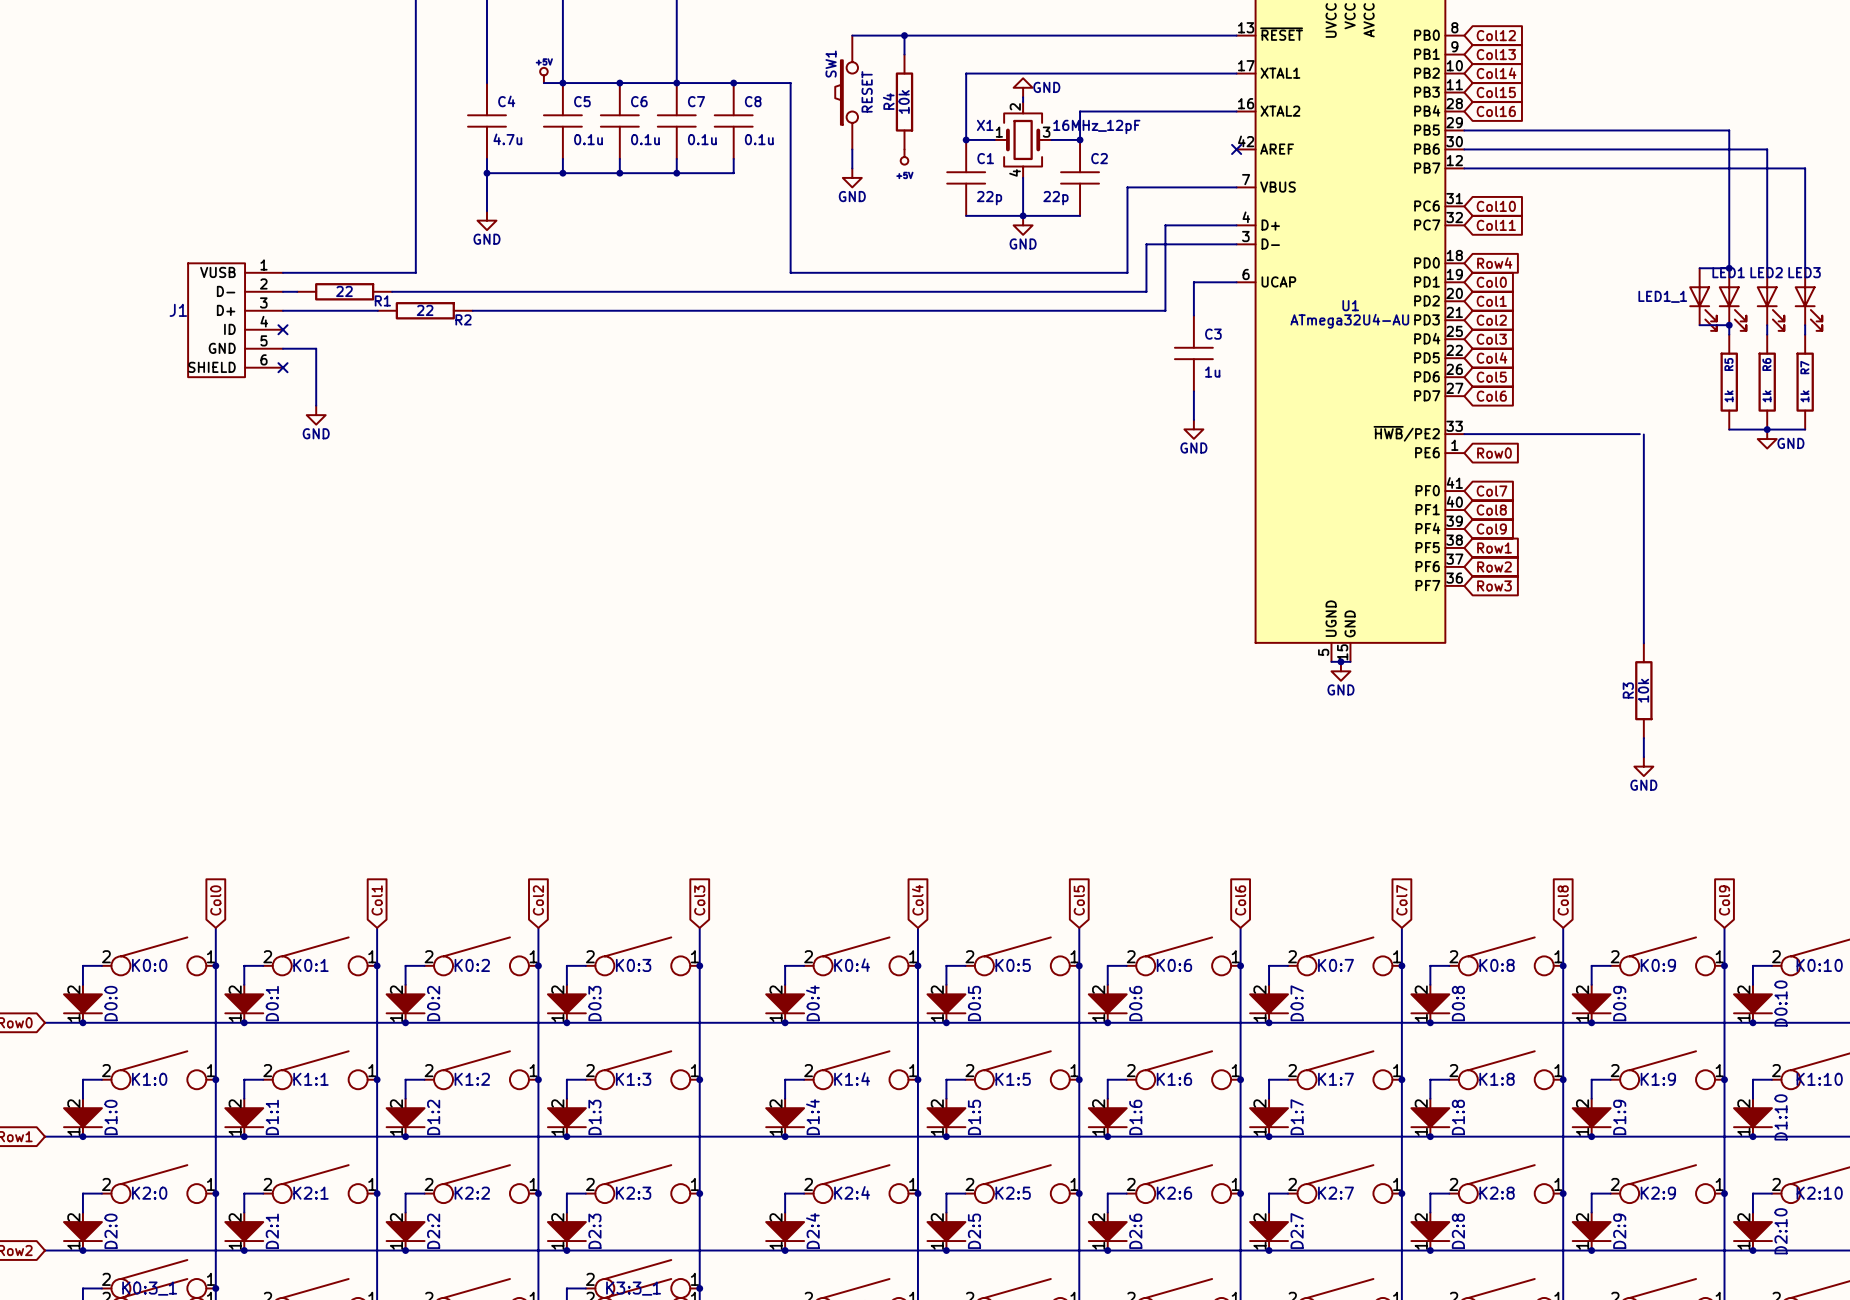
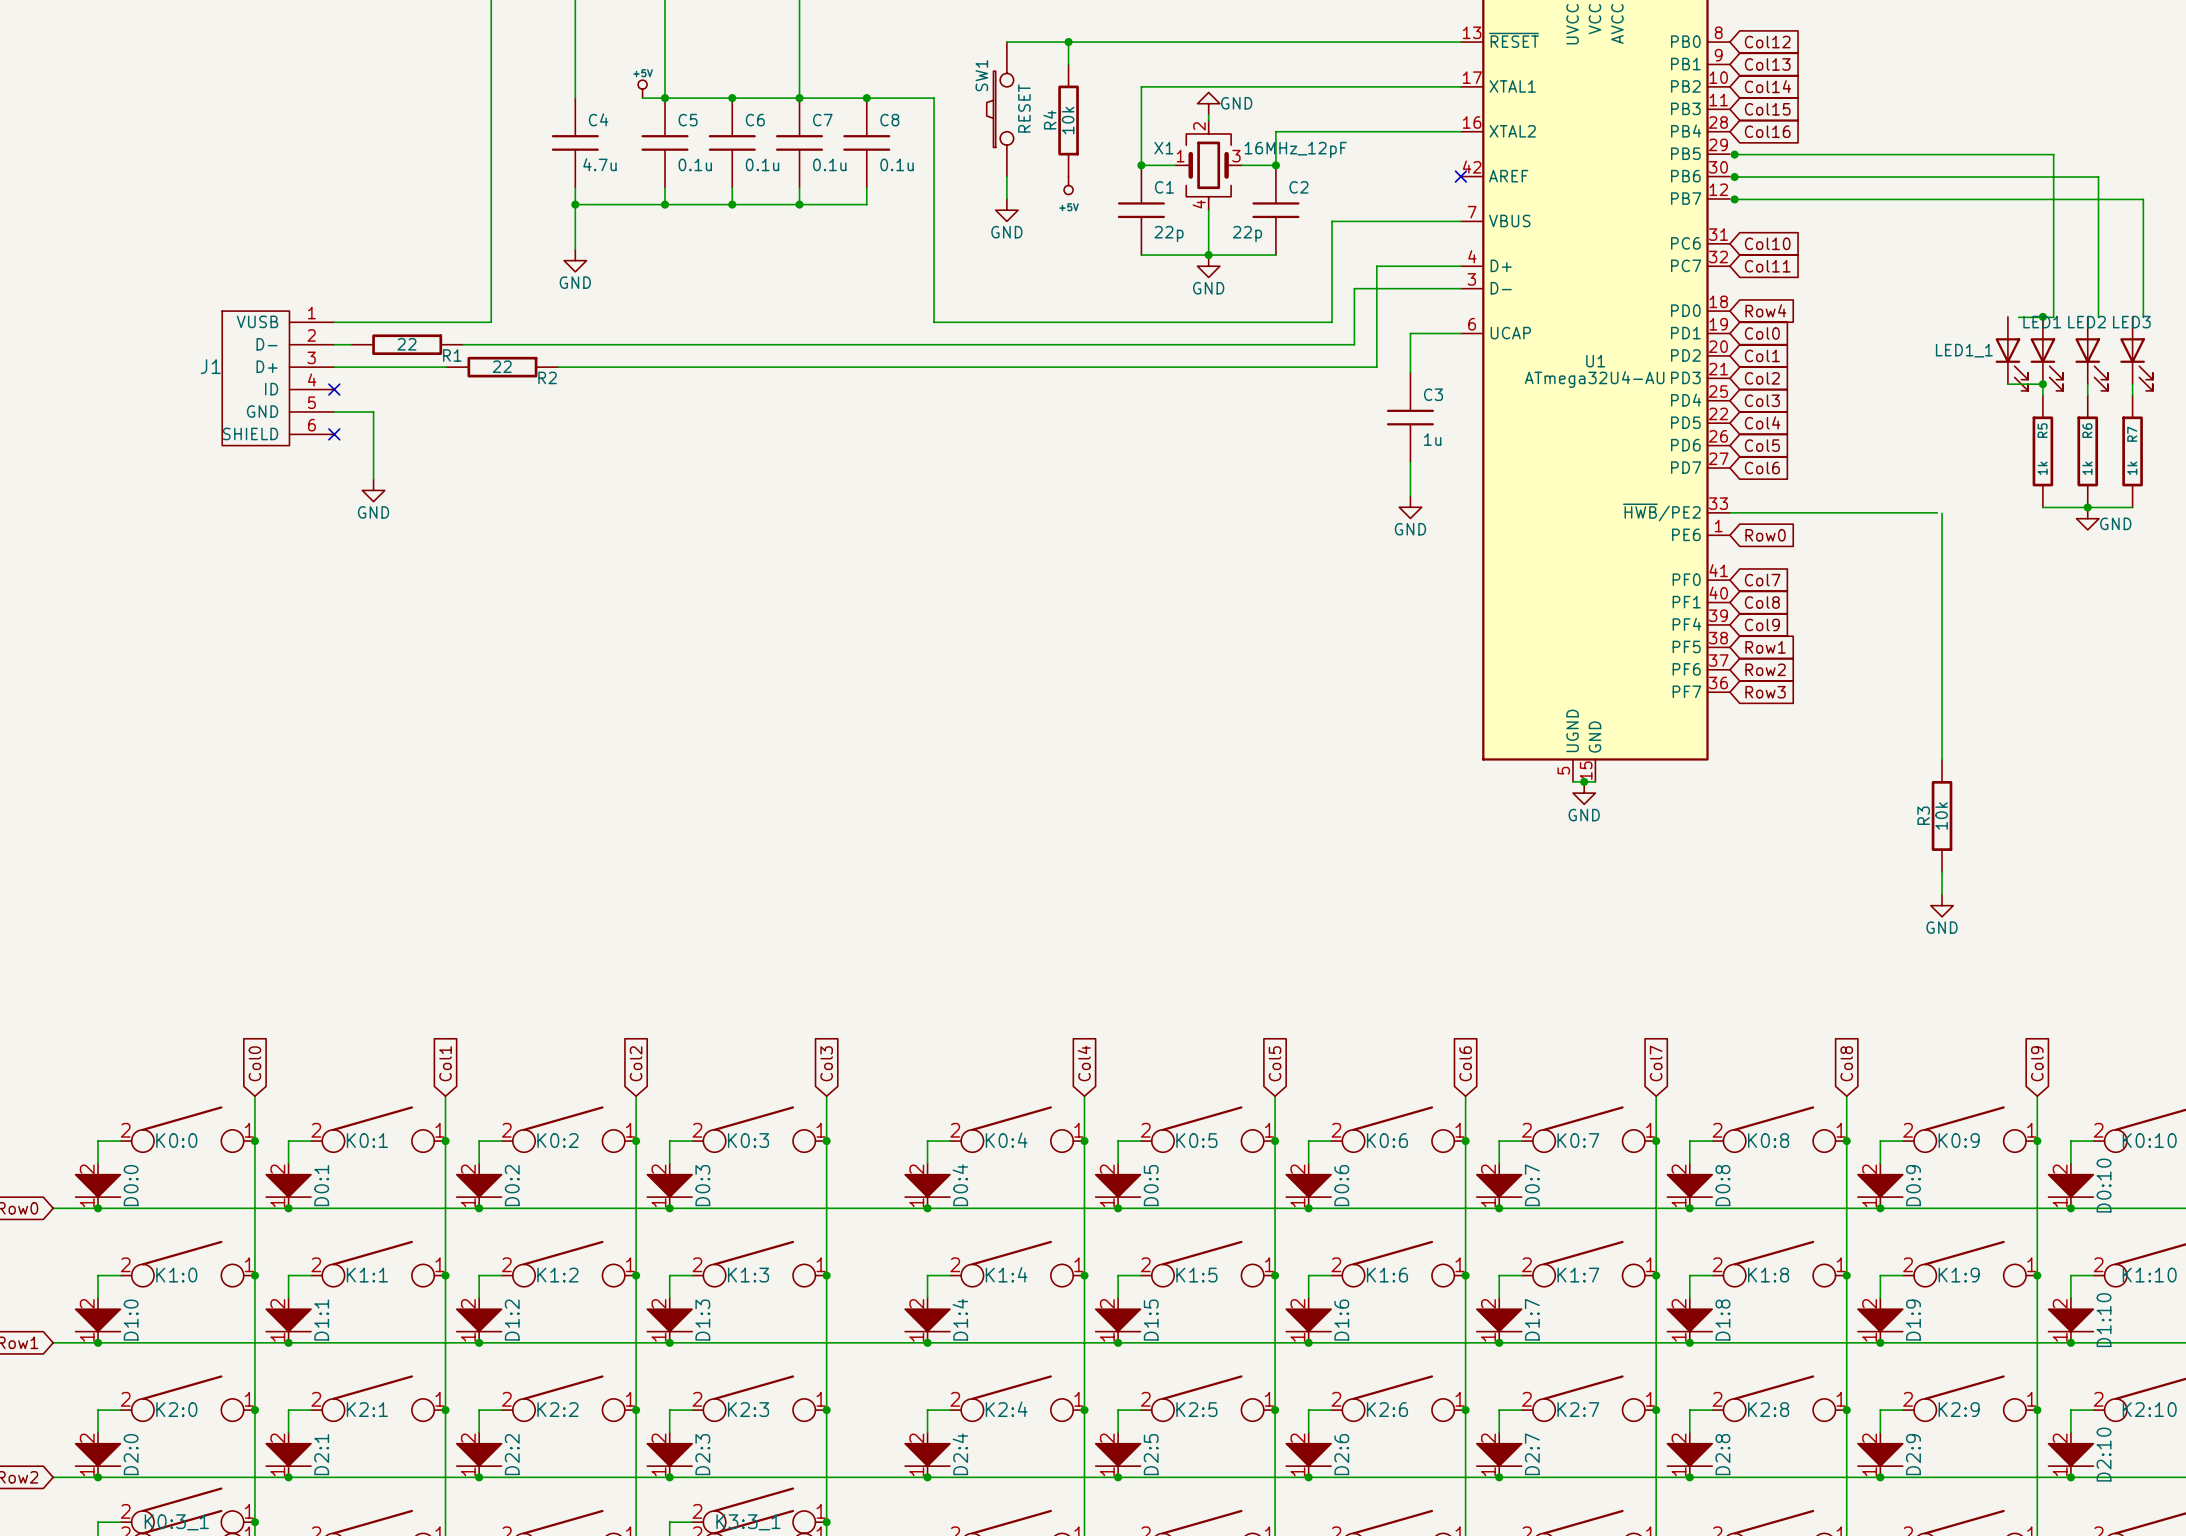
wire: (1464, 130) (1729, 130) (1729, 268) (1699, 268) -> none
wire: none -> (1734, 154) (2053, 154) (2053, 317) (2018, 317)
junction: none -> (1734, 154)
wire: (1464, 149) (1767, 149) (1767, 268) -> none
wire: none -> (1734, 177) (2098, 177) (2098, 317)
junction: none -> (1734, 177)
wire: (1464, 168) (1805, 168) (1805, 268) -> none
wire: none -> (1734, 199) (2143, 199) (2143, 317)
junction: none -> (1734, 199)

